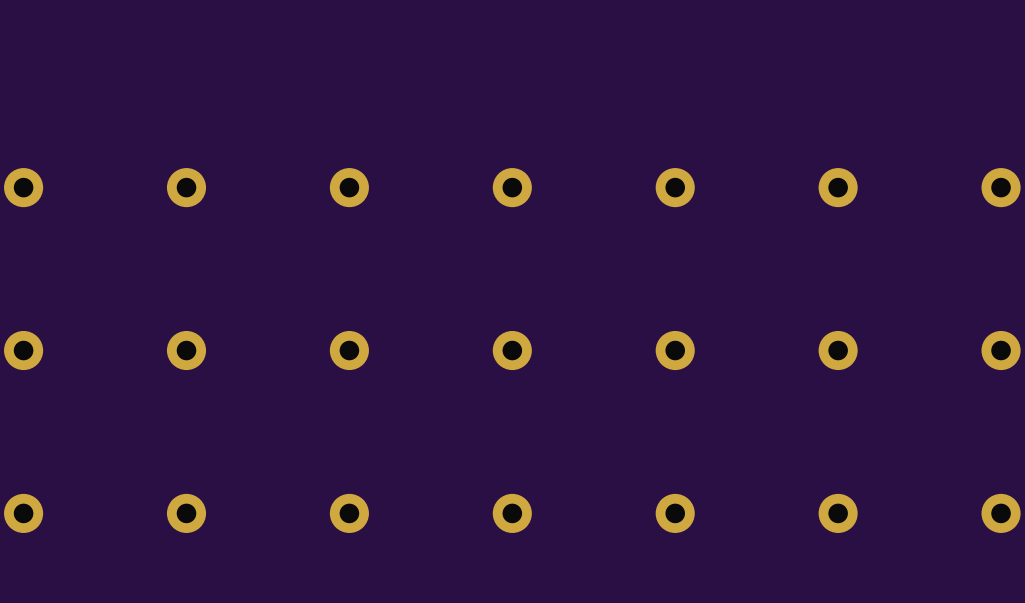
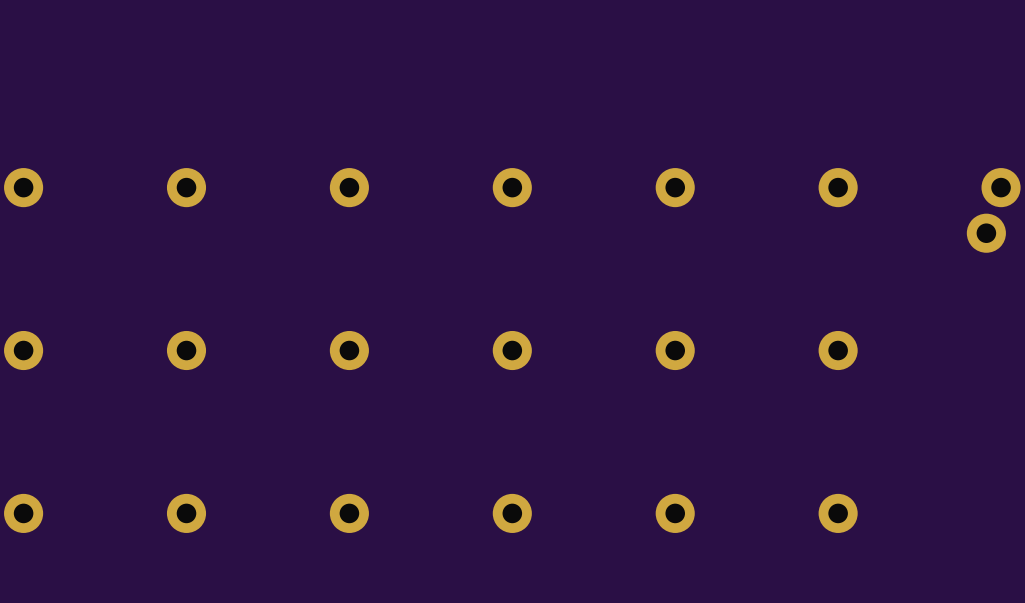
via: none -> (986, 233)
via: (1001, 350) -> none
via: (1001, 513) -> none

